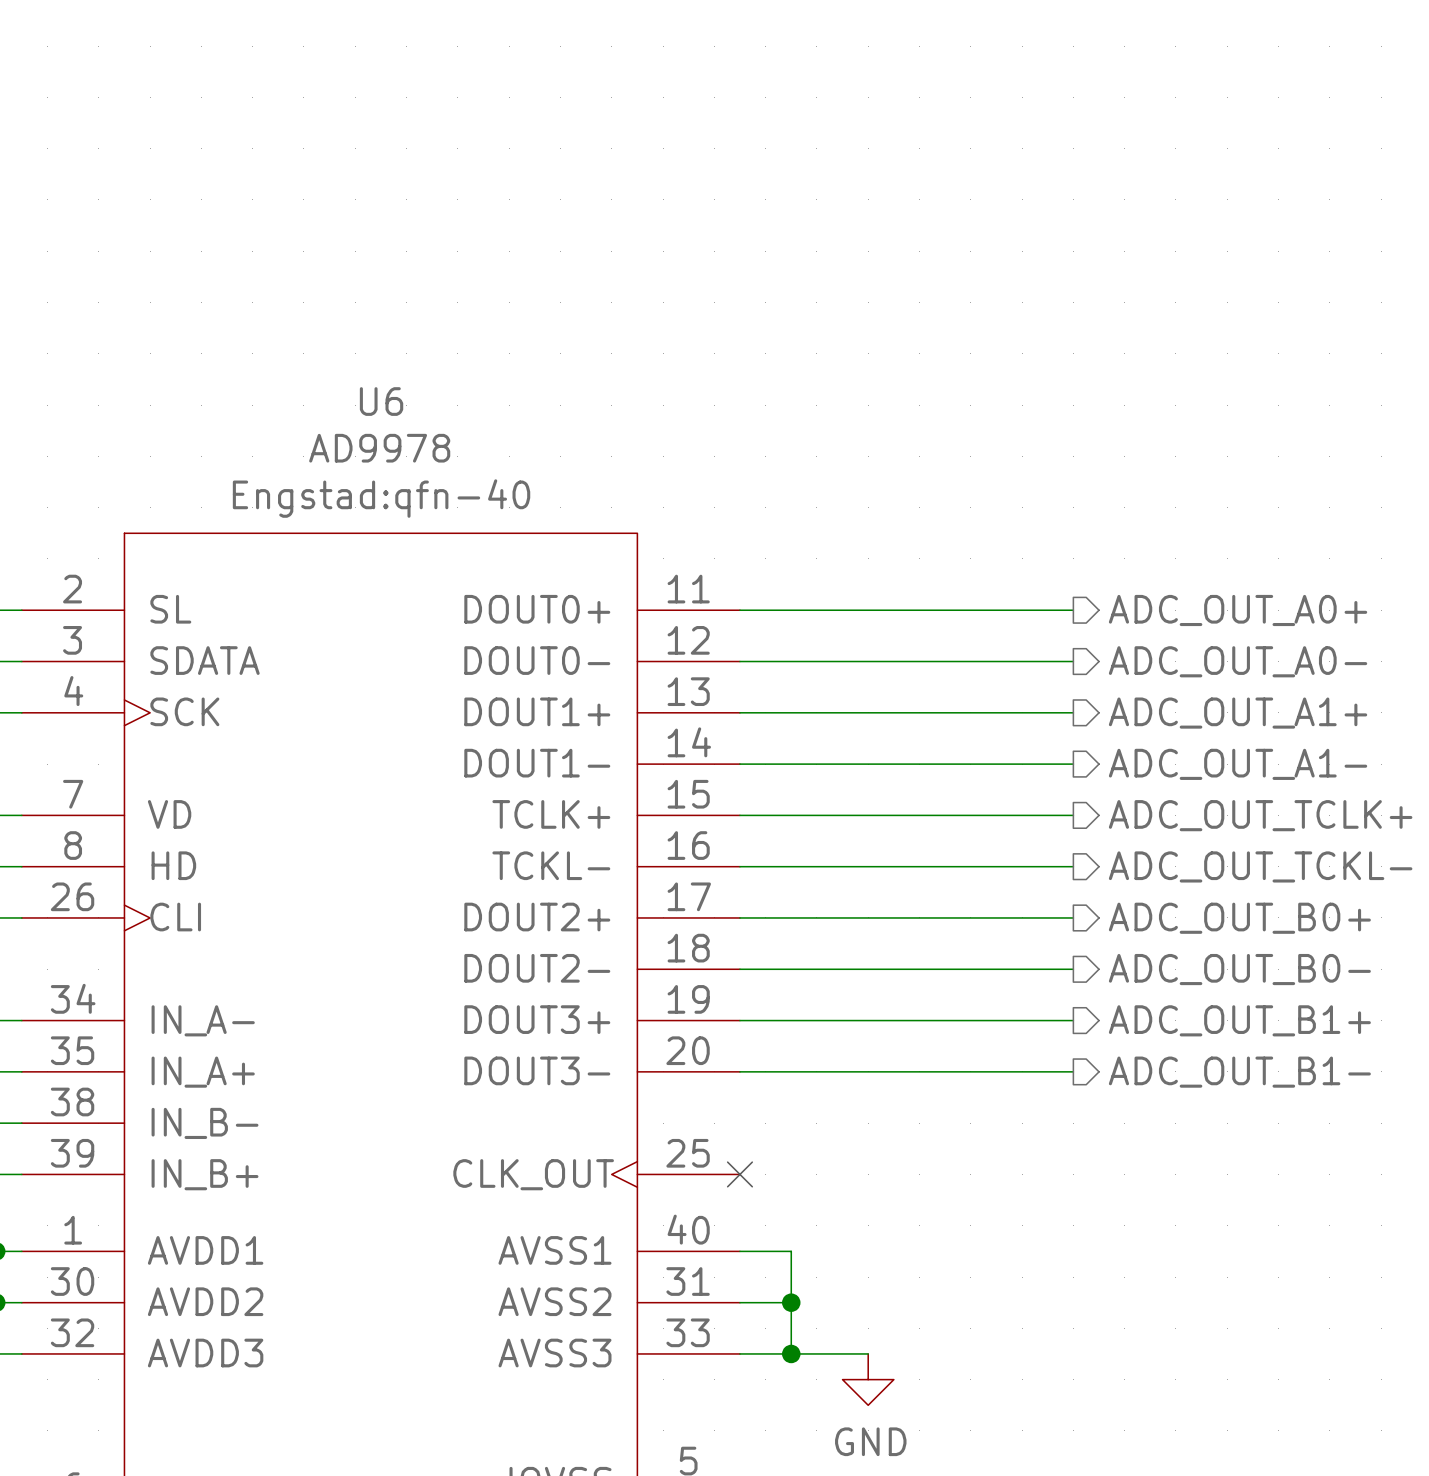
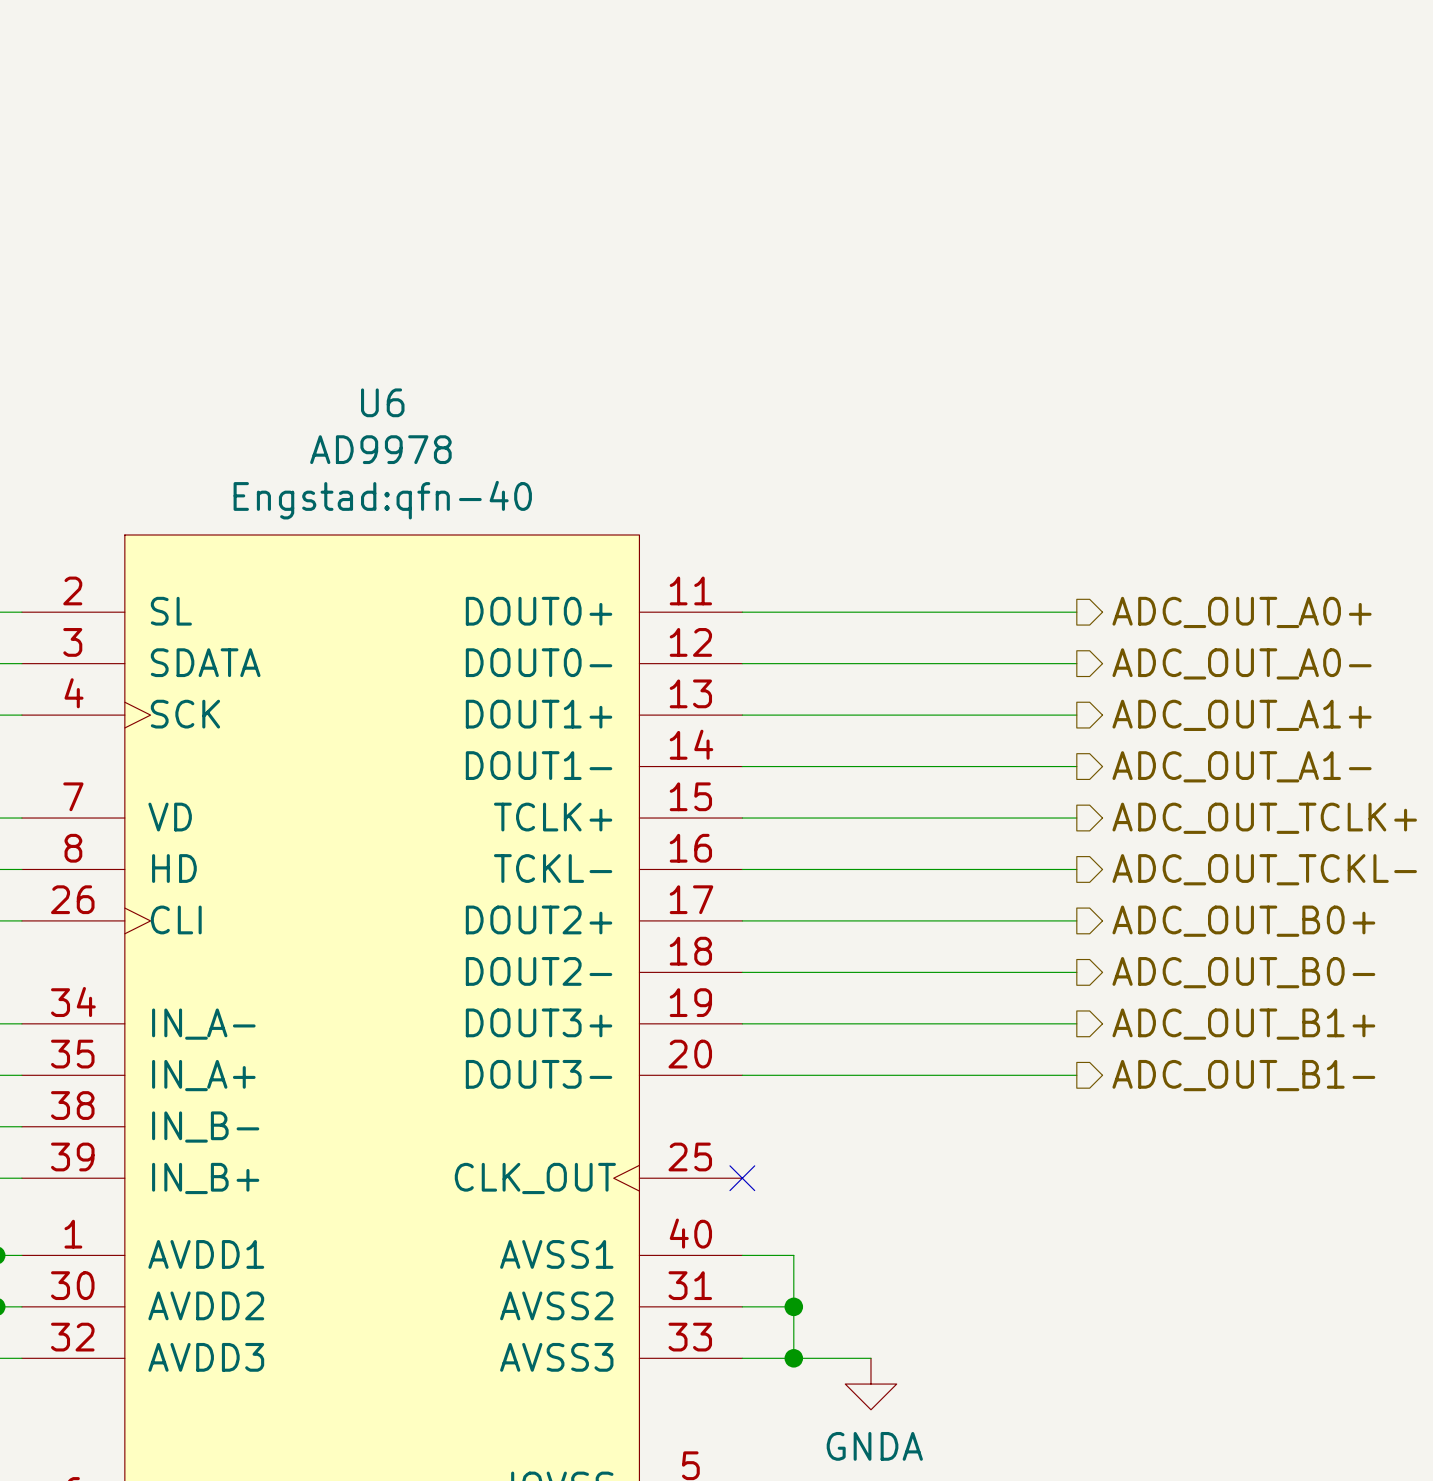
power symbol: GND (868, 1379) -> GNDA (870, 1384)

